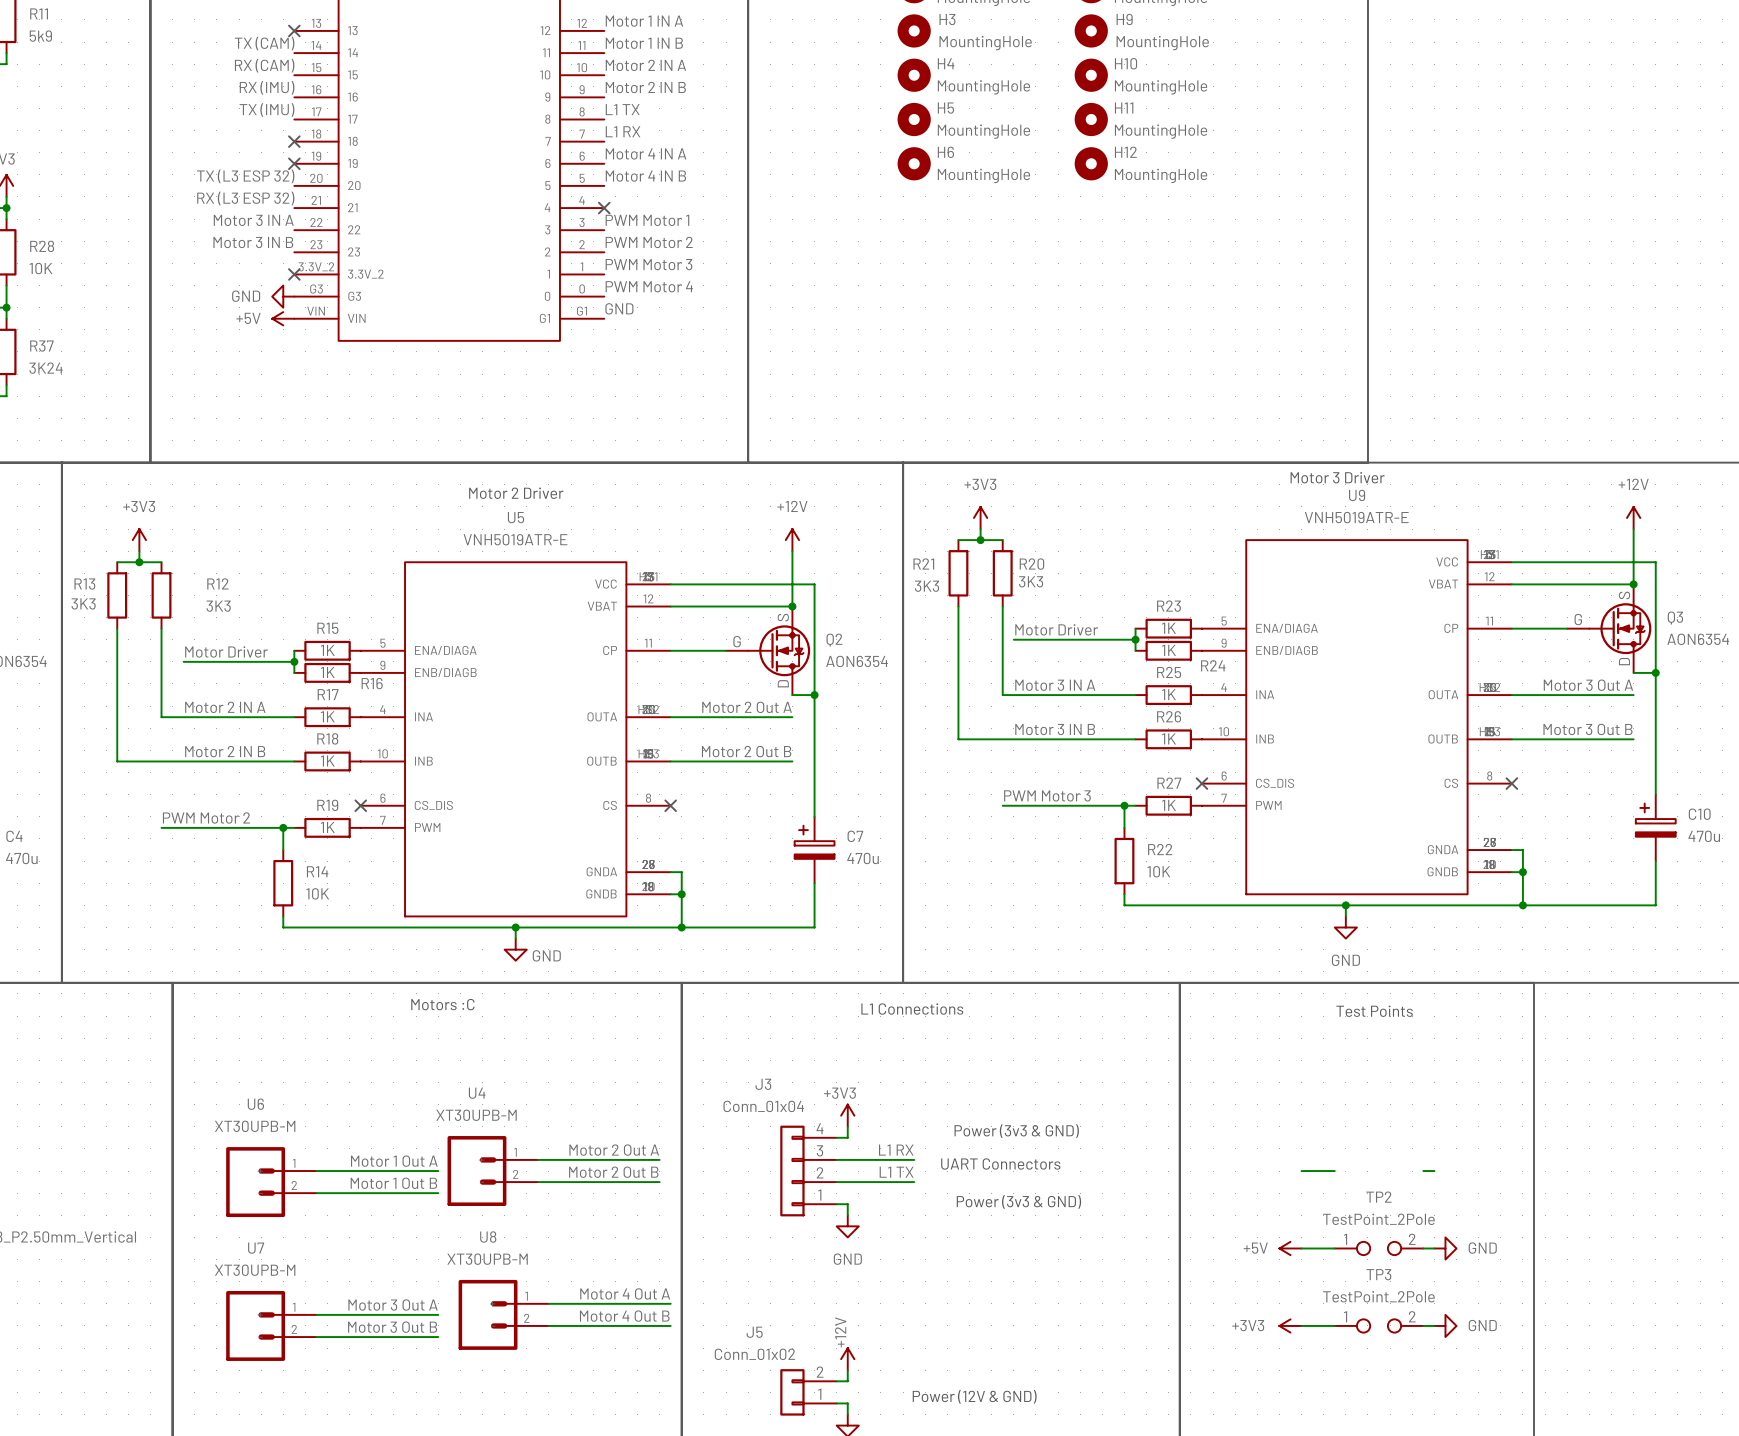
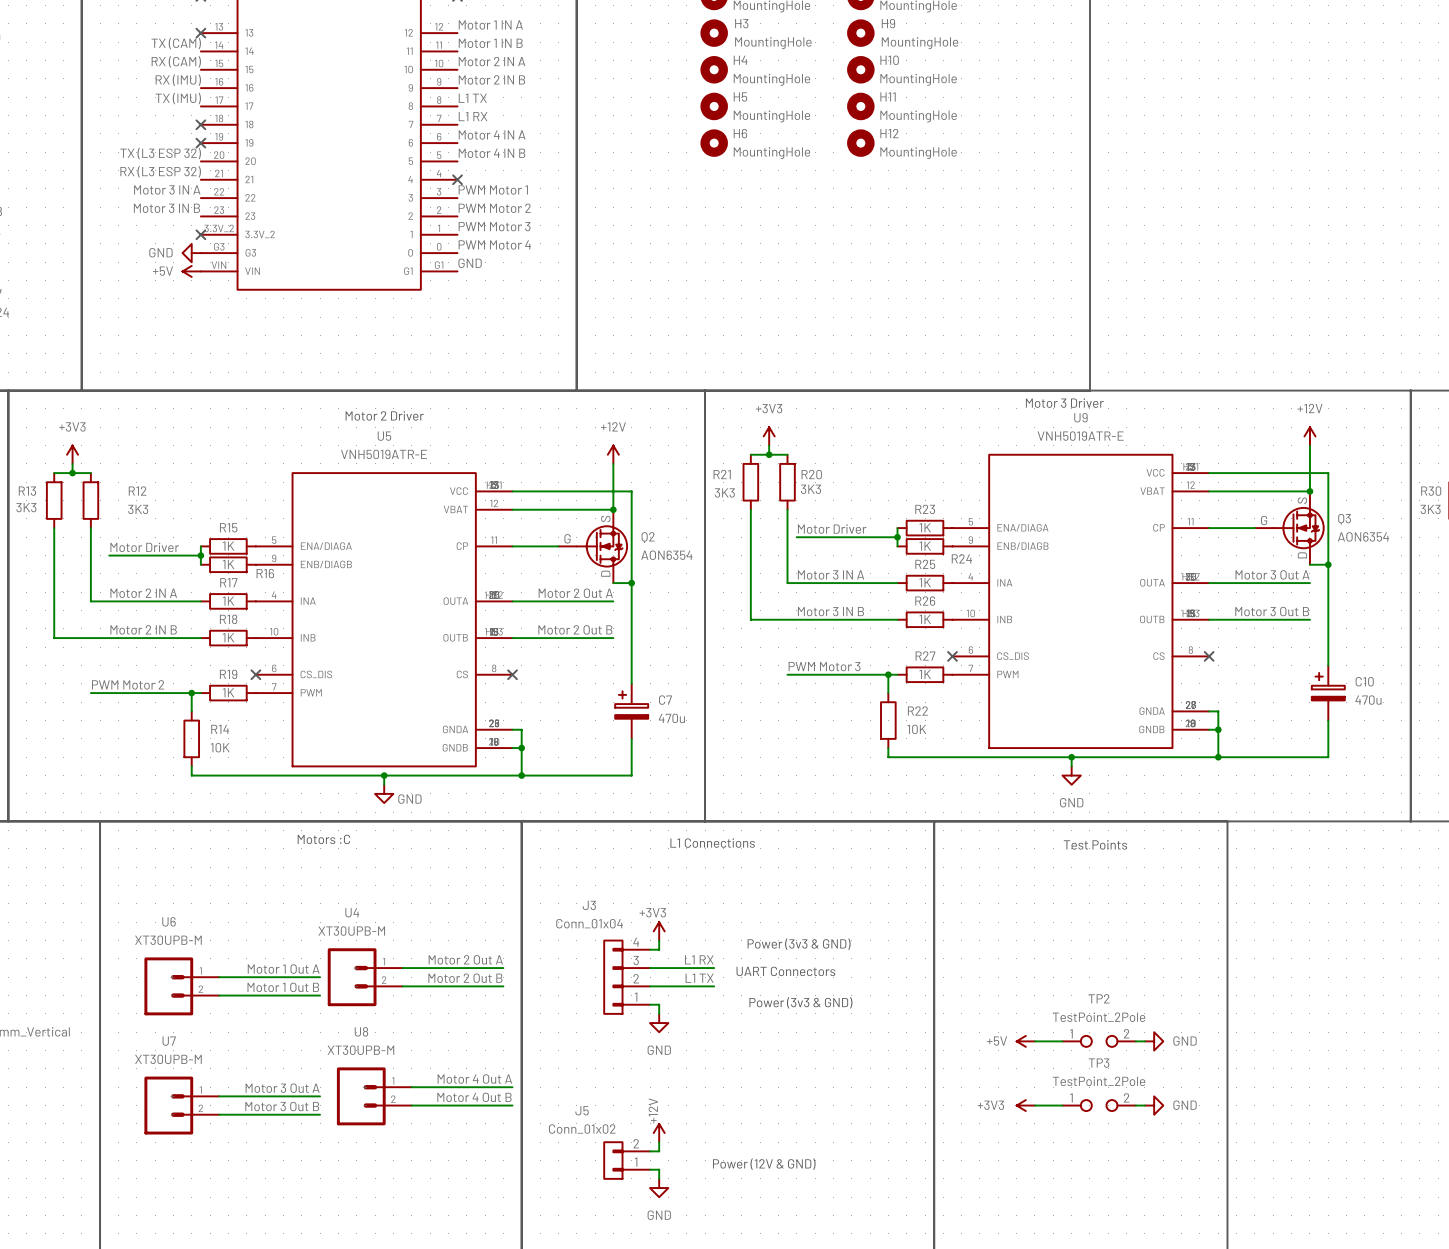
wire: (1301, 1171) (1334, 1171) -> none
wire: (1423, 1171) (1434, 1171) -> none

